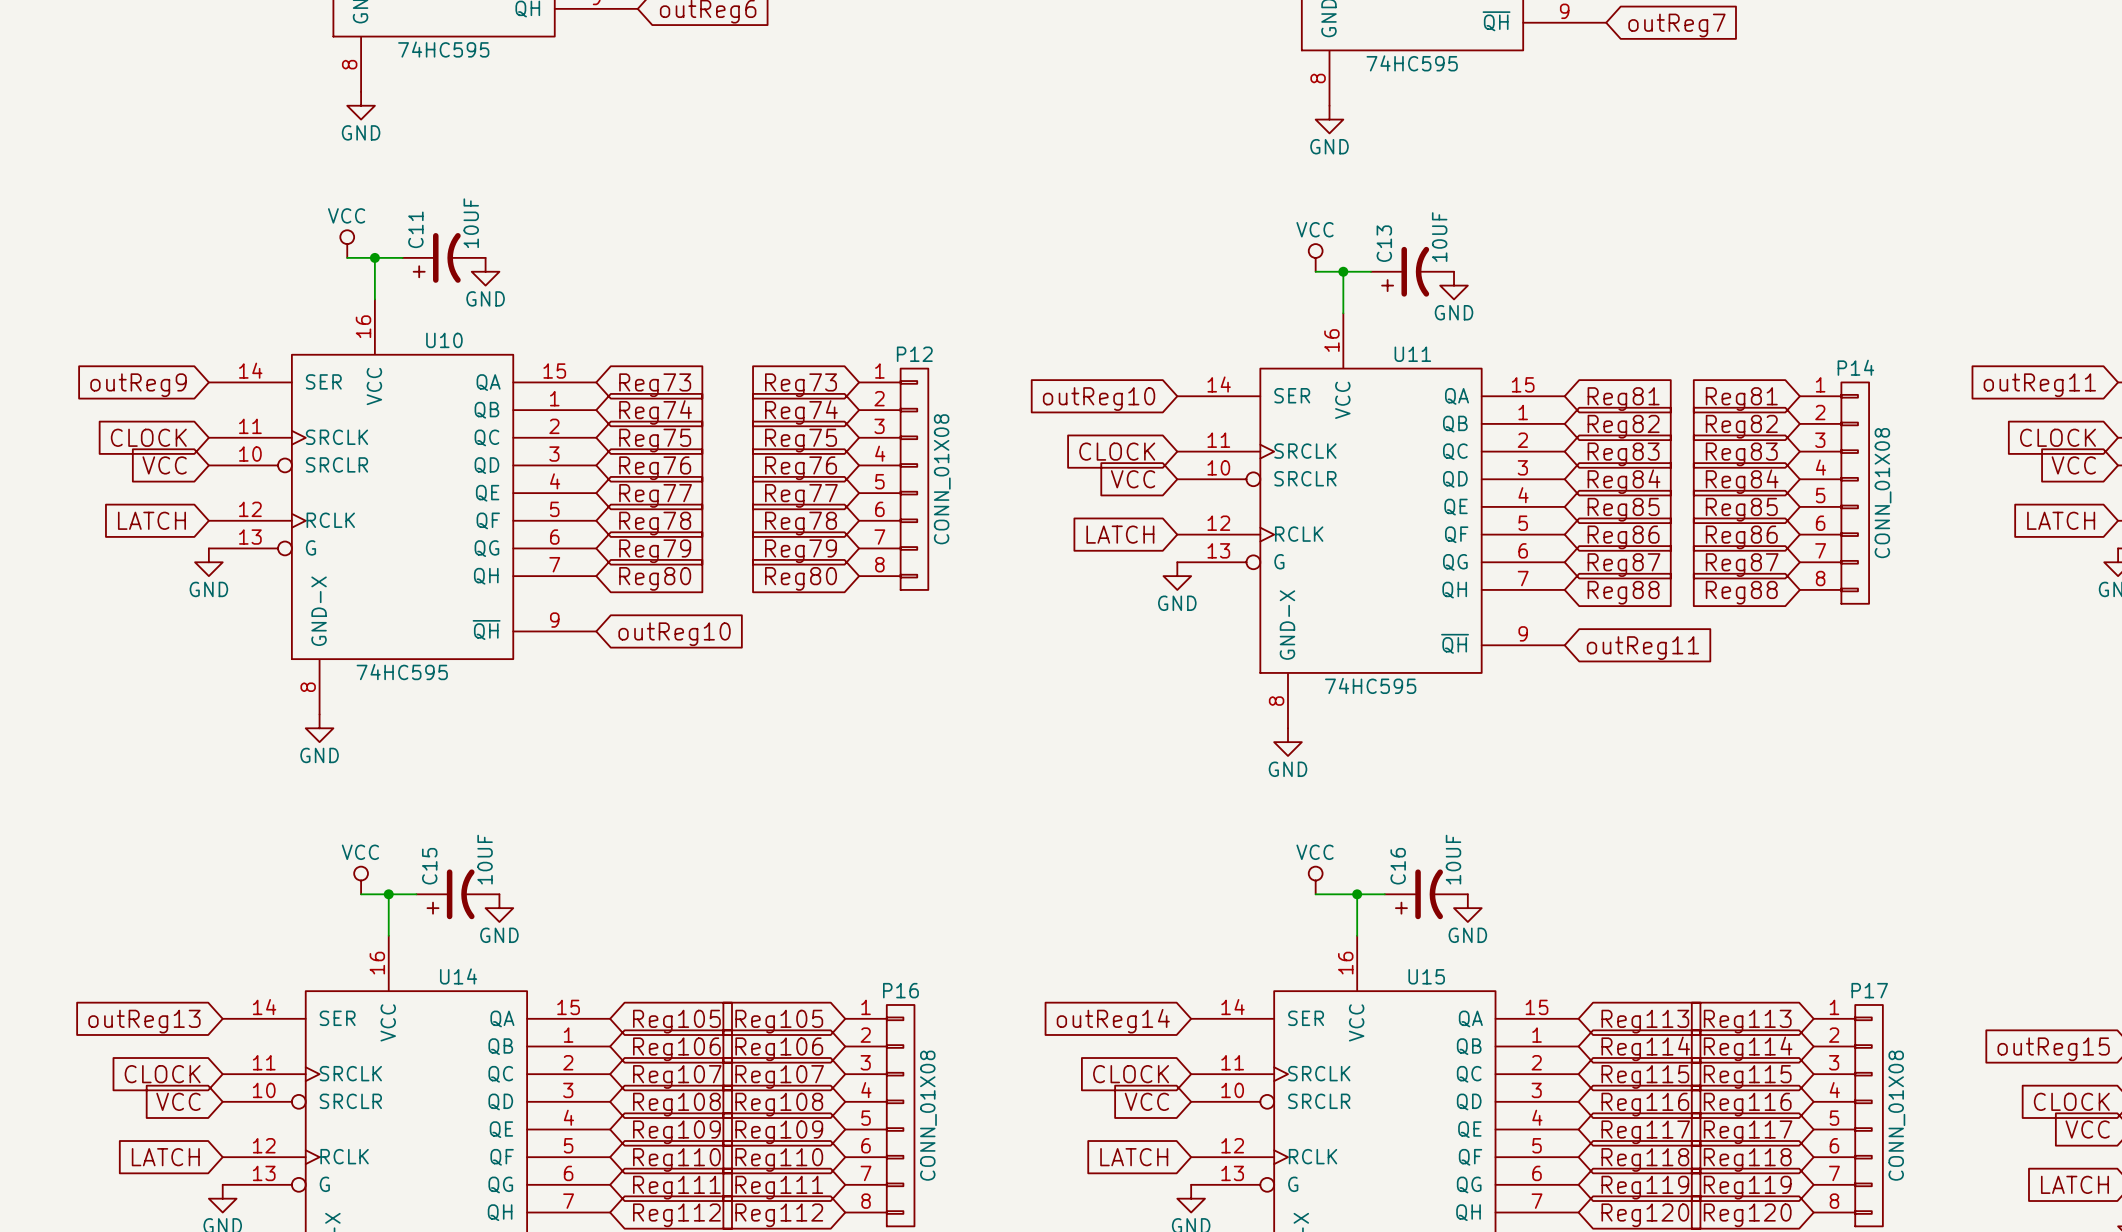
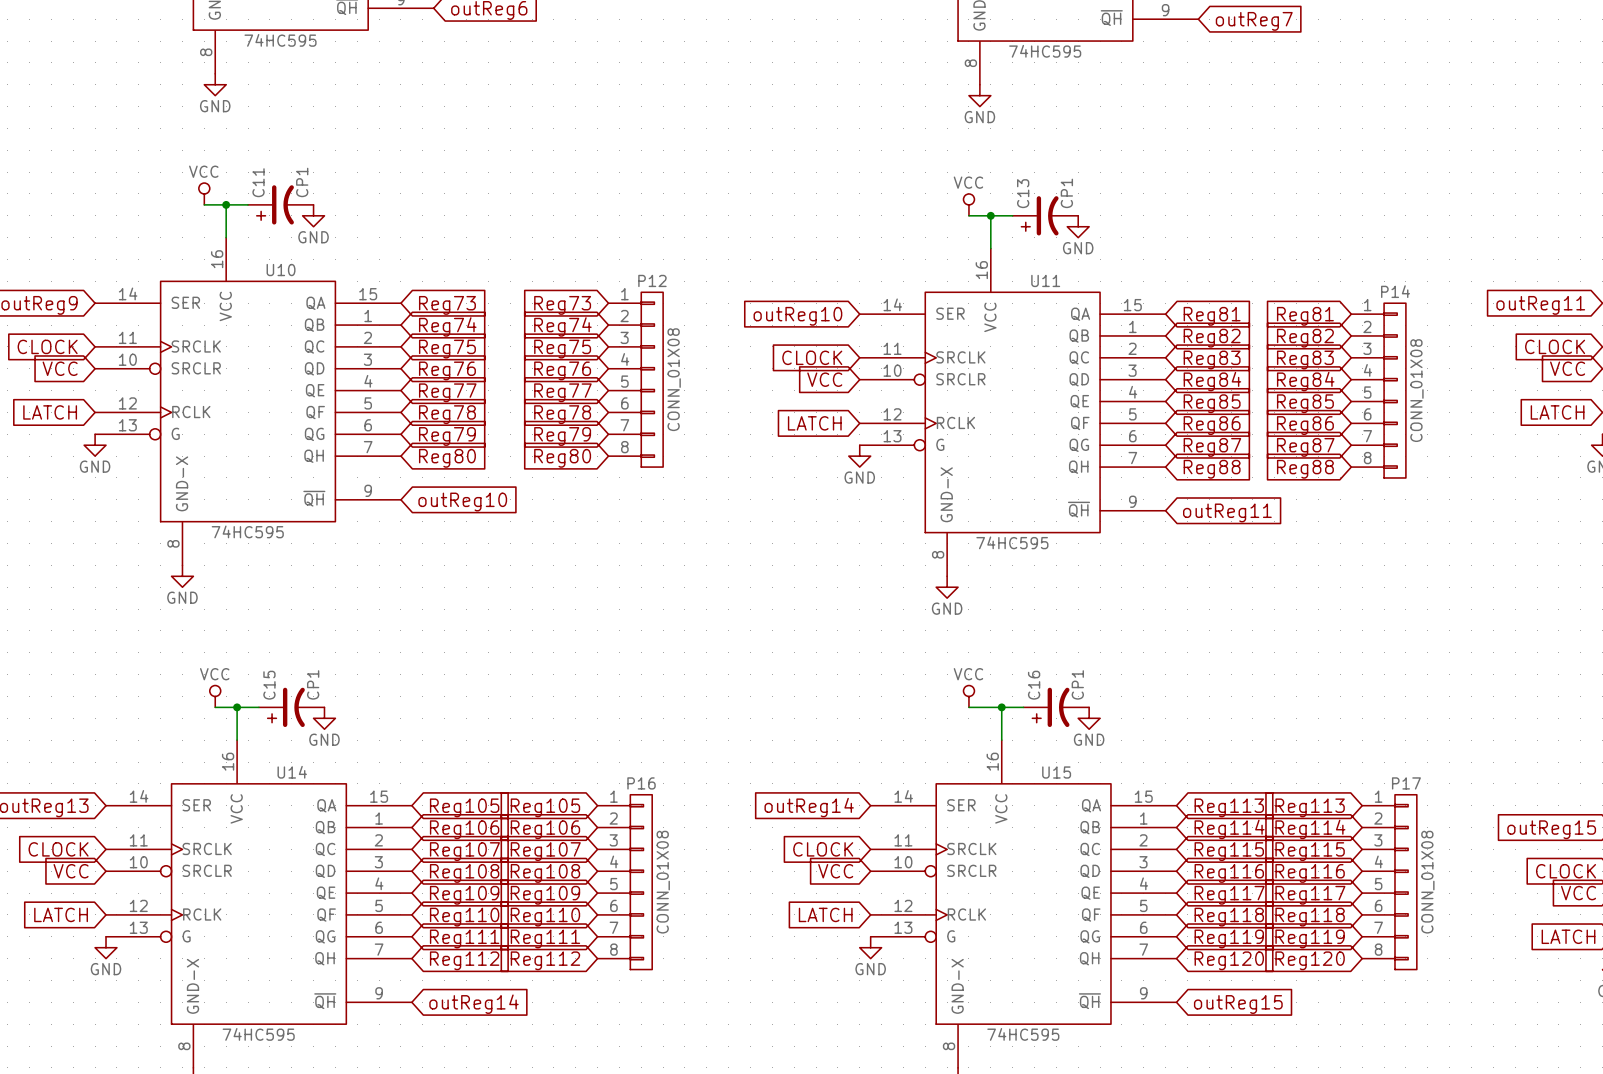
C11 value: 10UF (471, 223) -> CP1 (302, 182)
C13 value: 10UF (1439, 237) -> CP1 (1066, 193)
C15 value: 10UF (485, 859) -> CP1 (313, 684)
C16 value: 10UF (1453, 859) -> CP1 (1077, 684)

